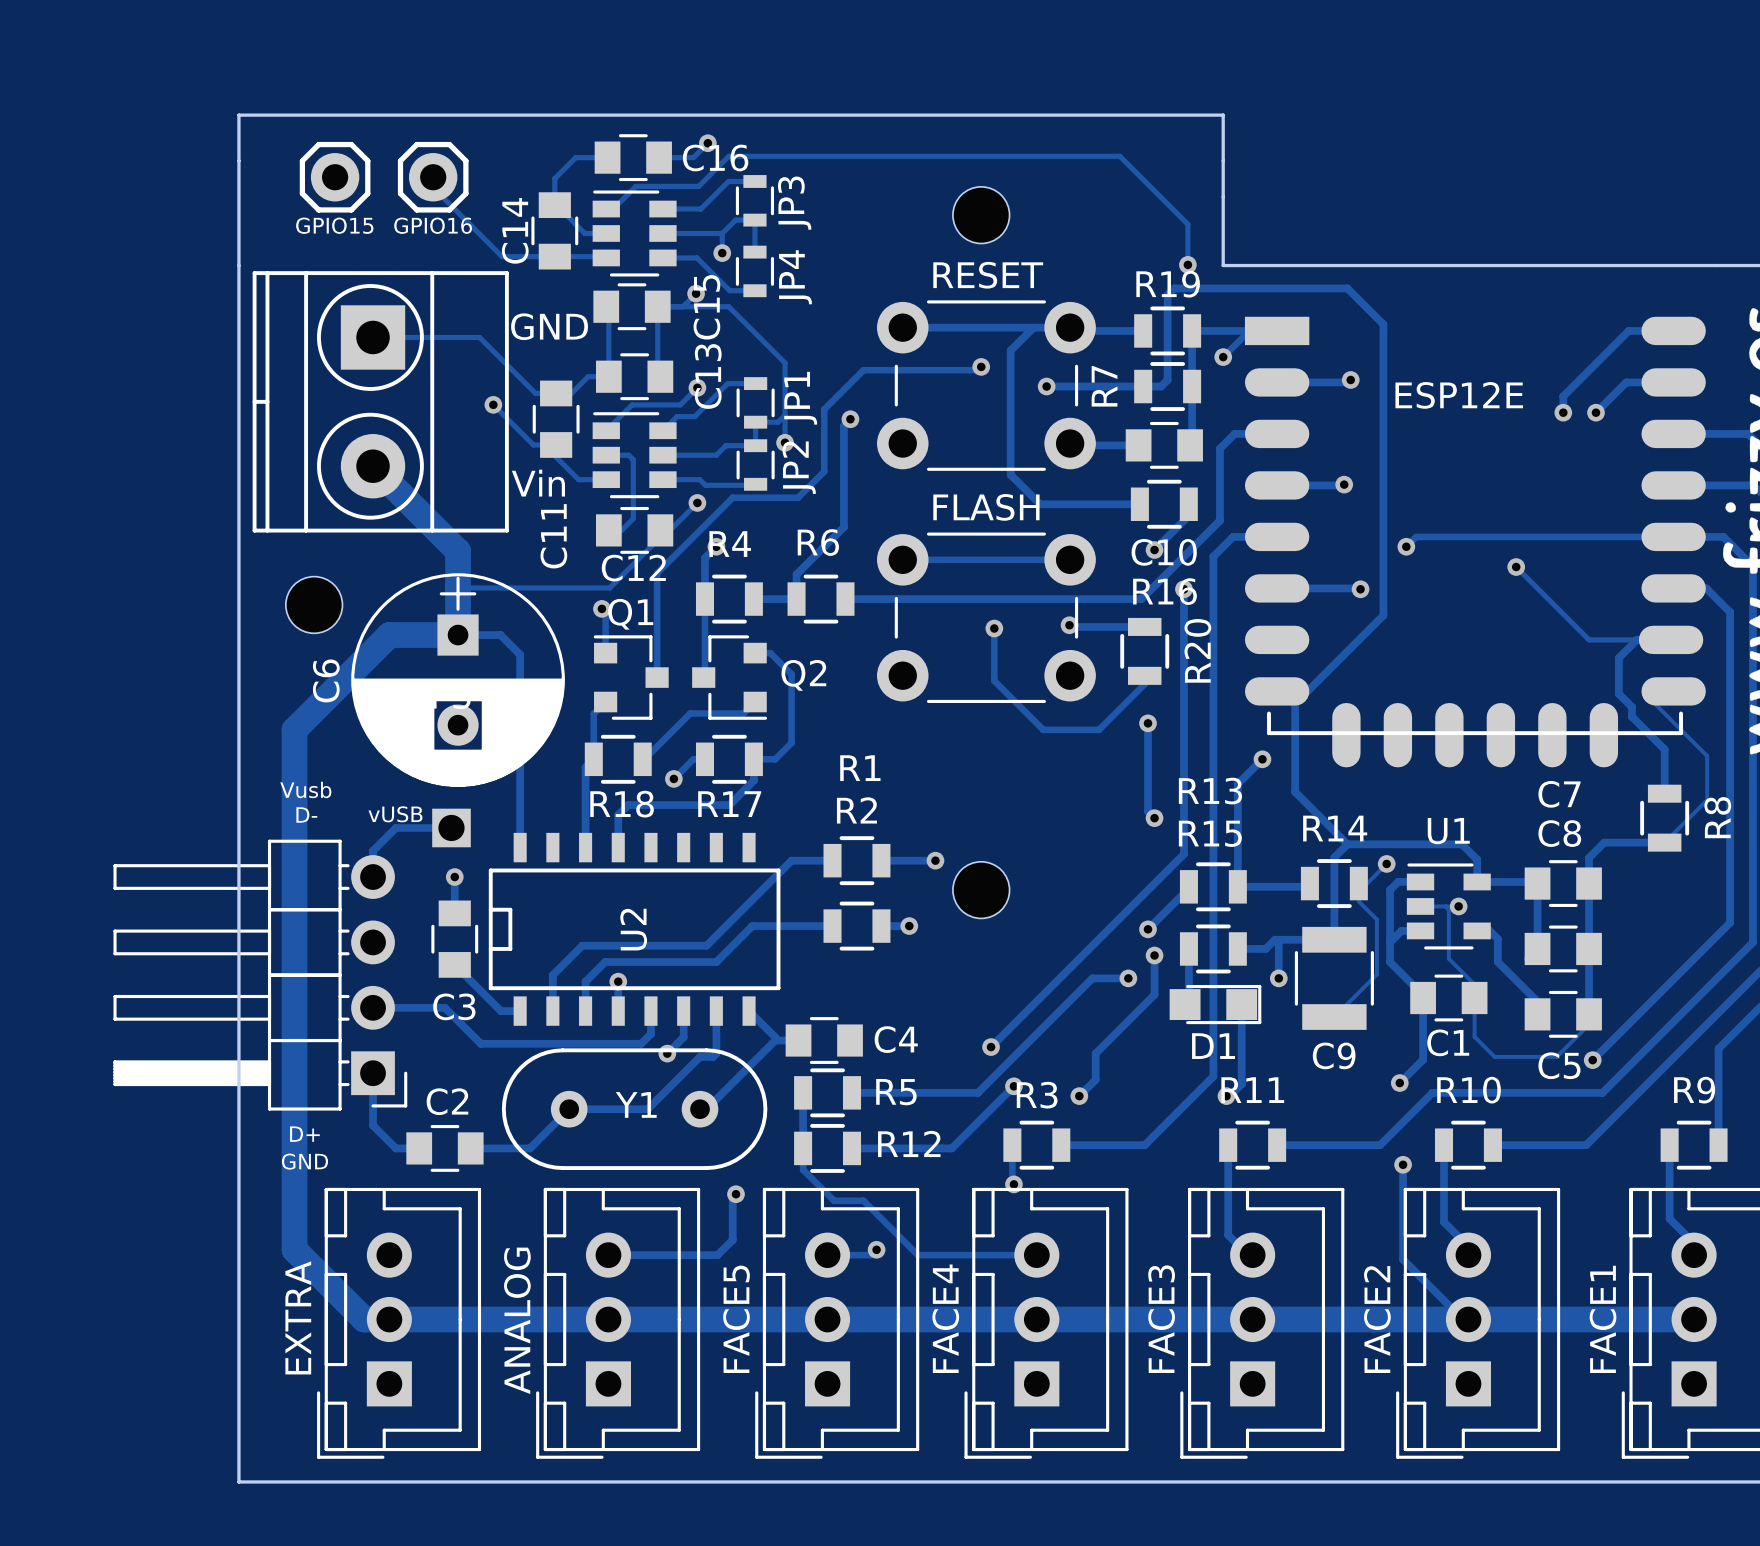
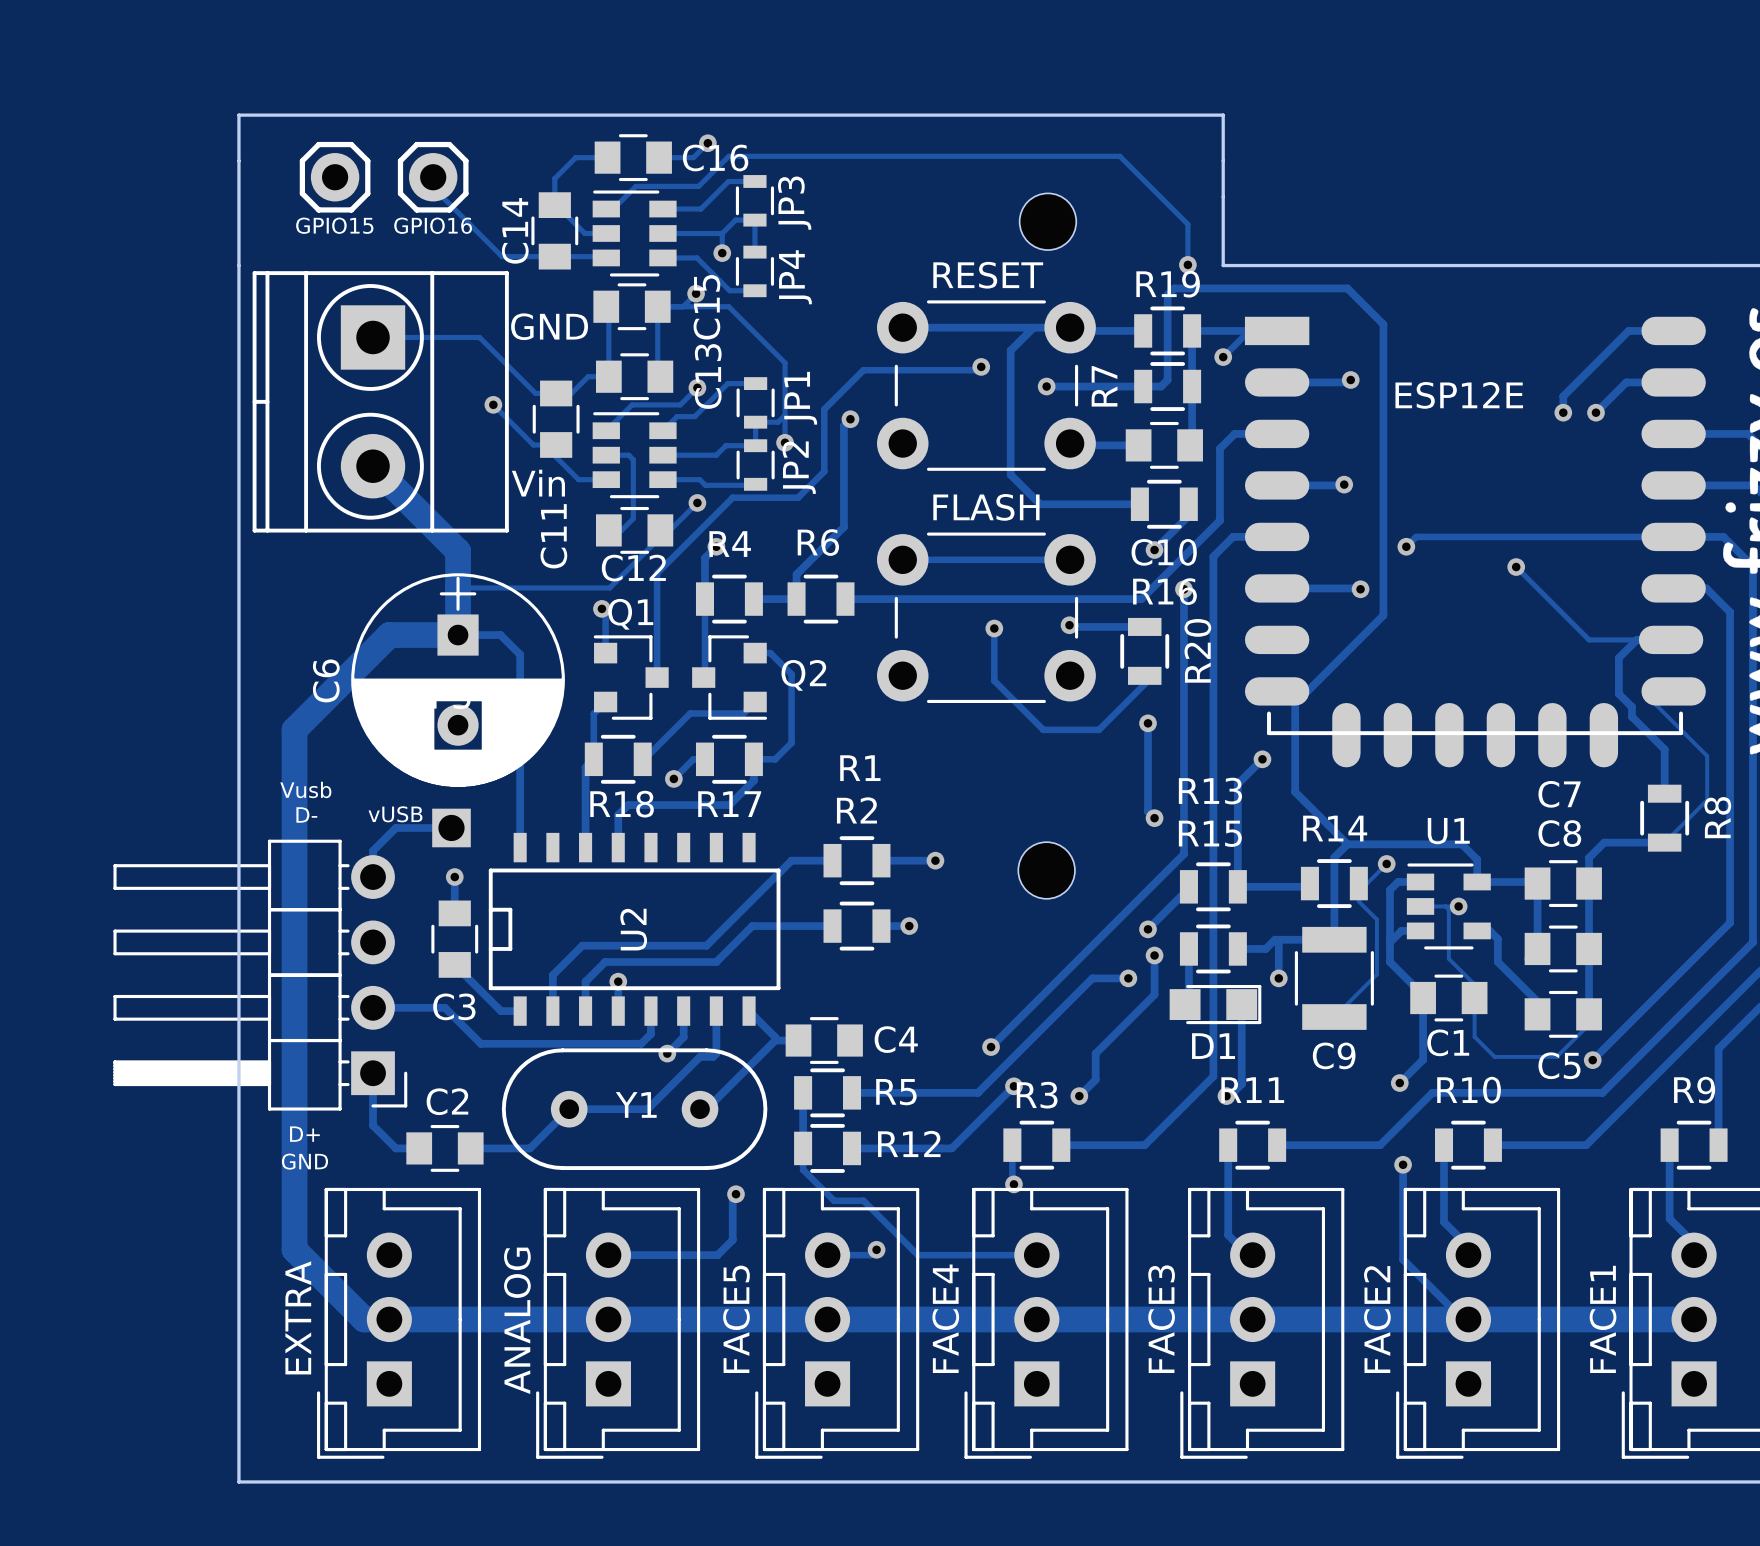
part position: (981, 215) -> (1047, 221)
part: (314, 604) -> none
part position: (981, 890) -> (1046, 870)

